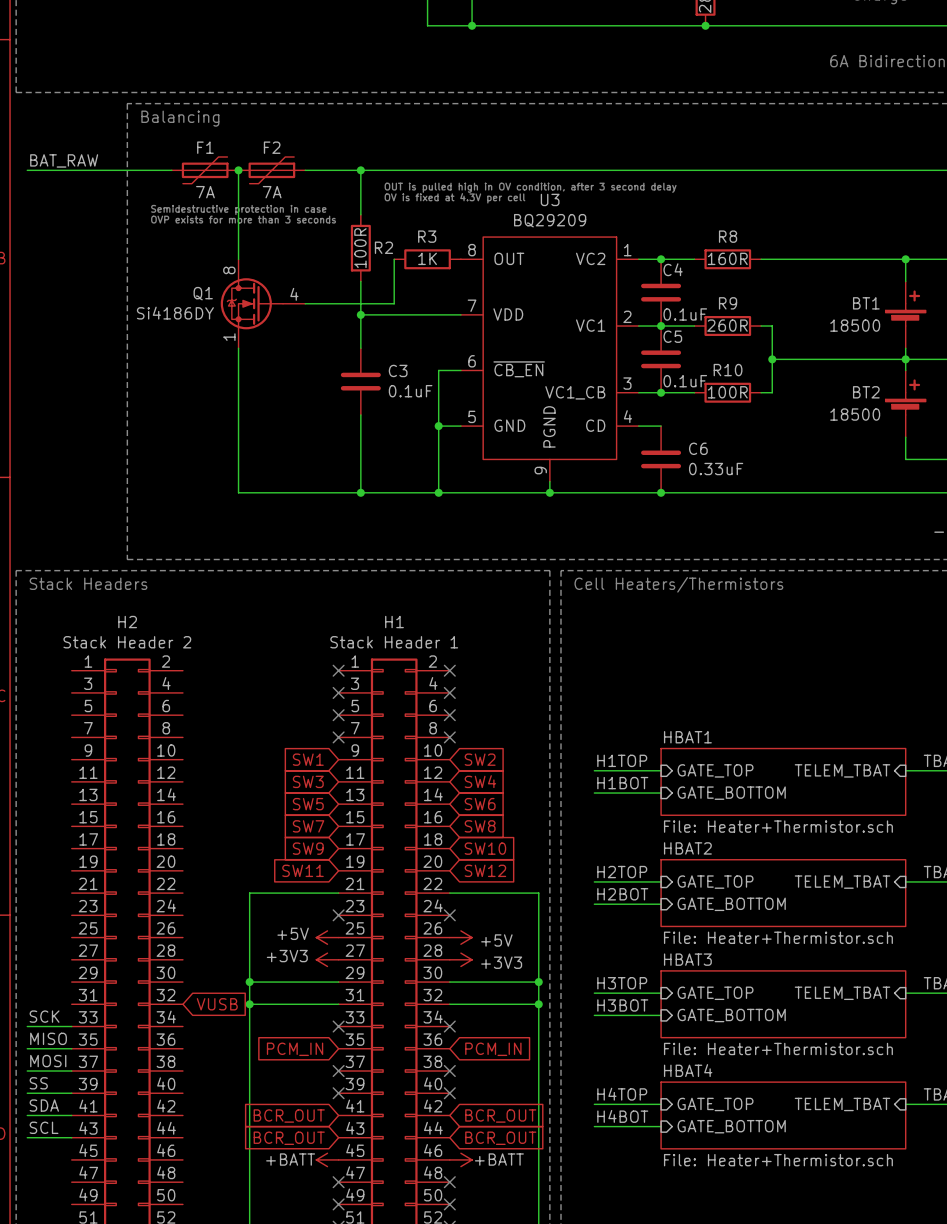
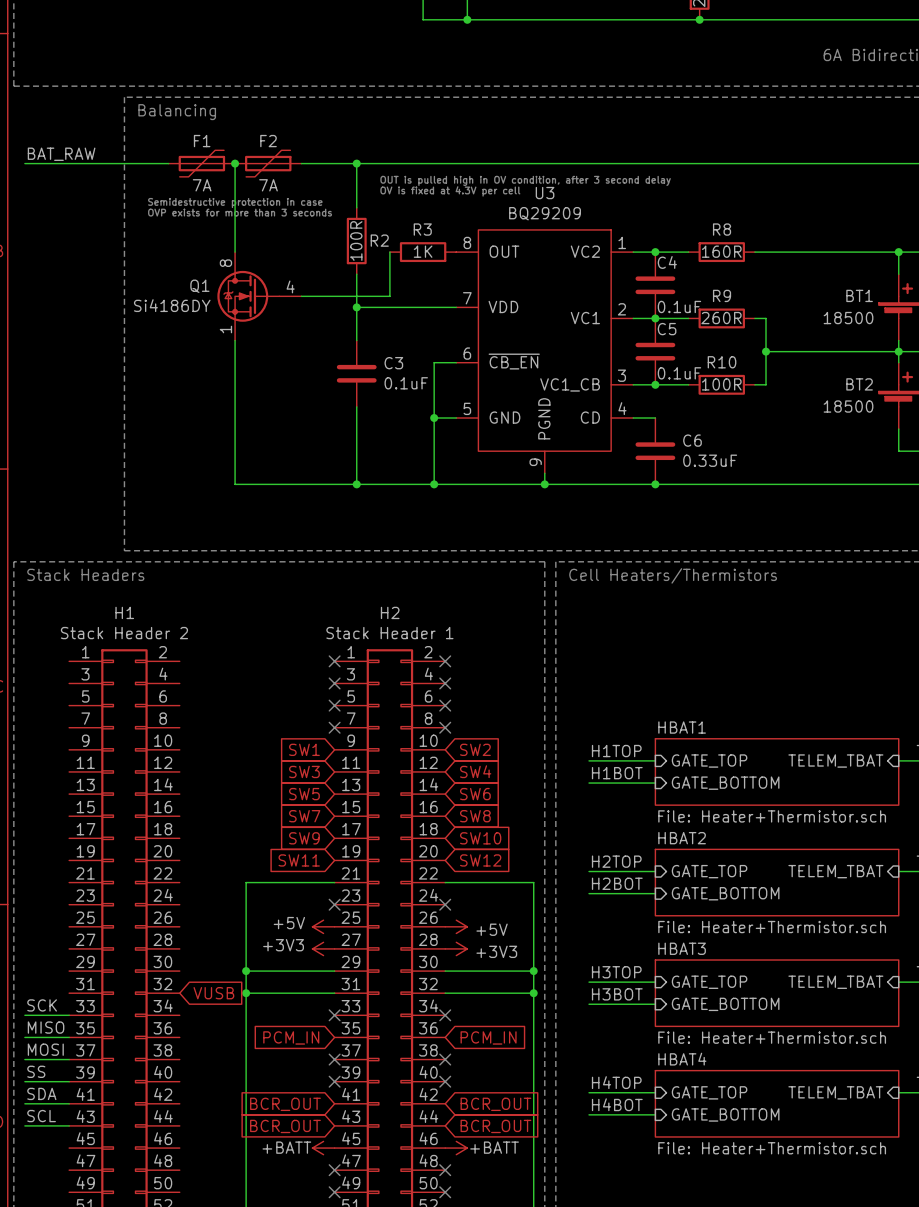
H2 name: H2 (127, 622) -> H1 (124, 612)
H1 name: H1 (394, 622) -> H2 (390, 612)

